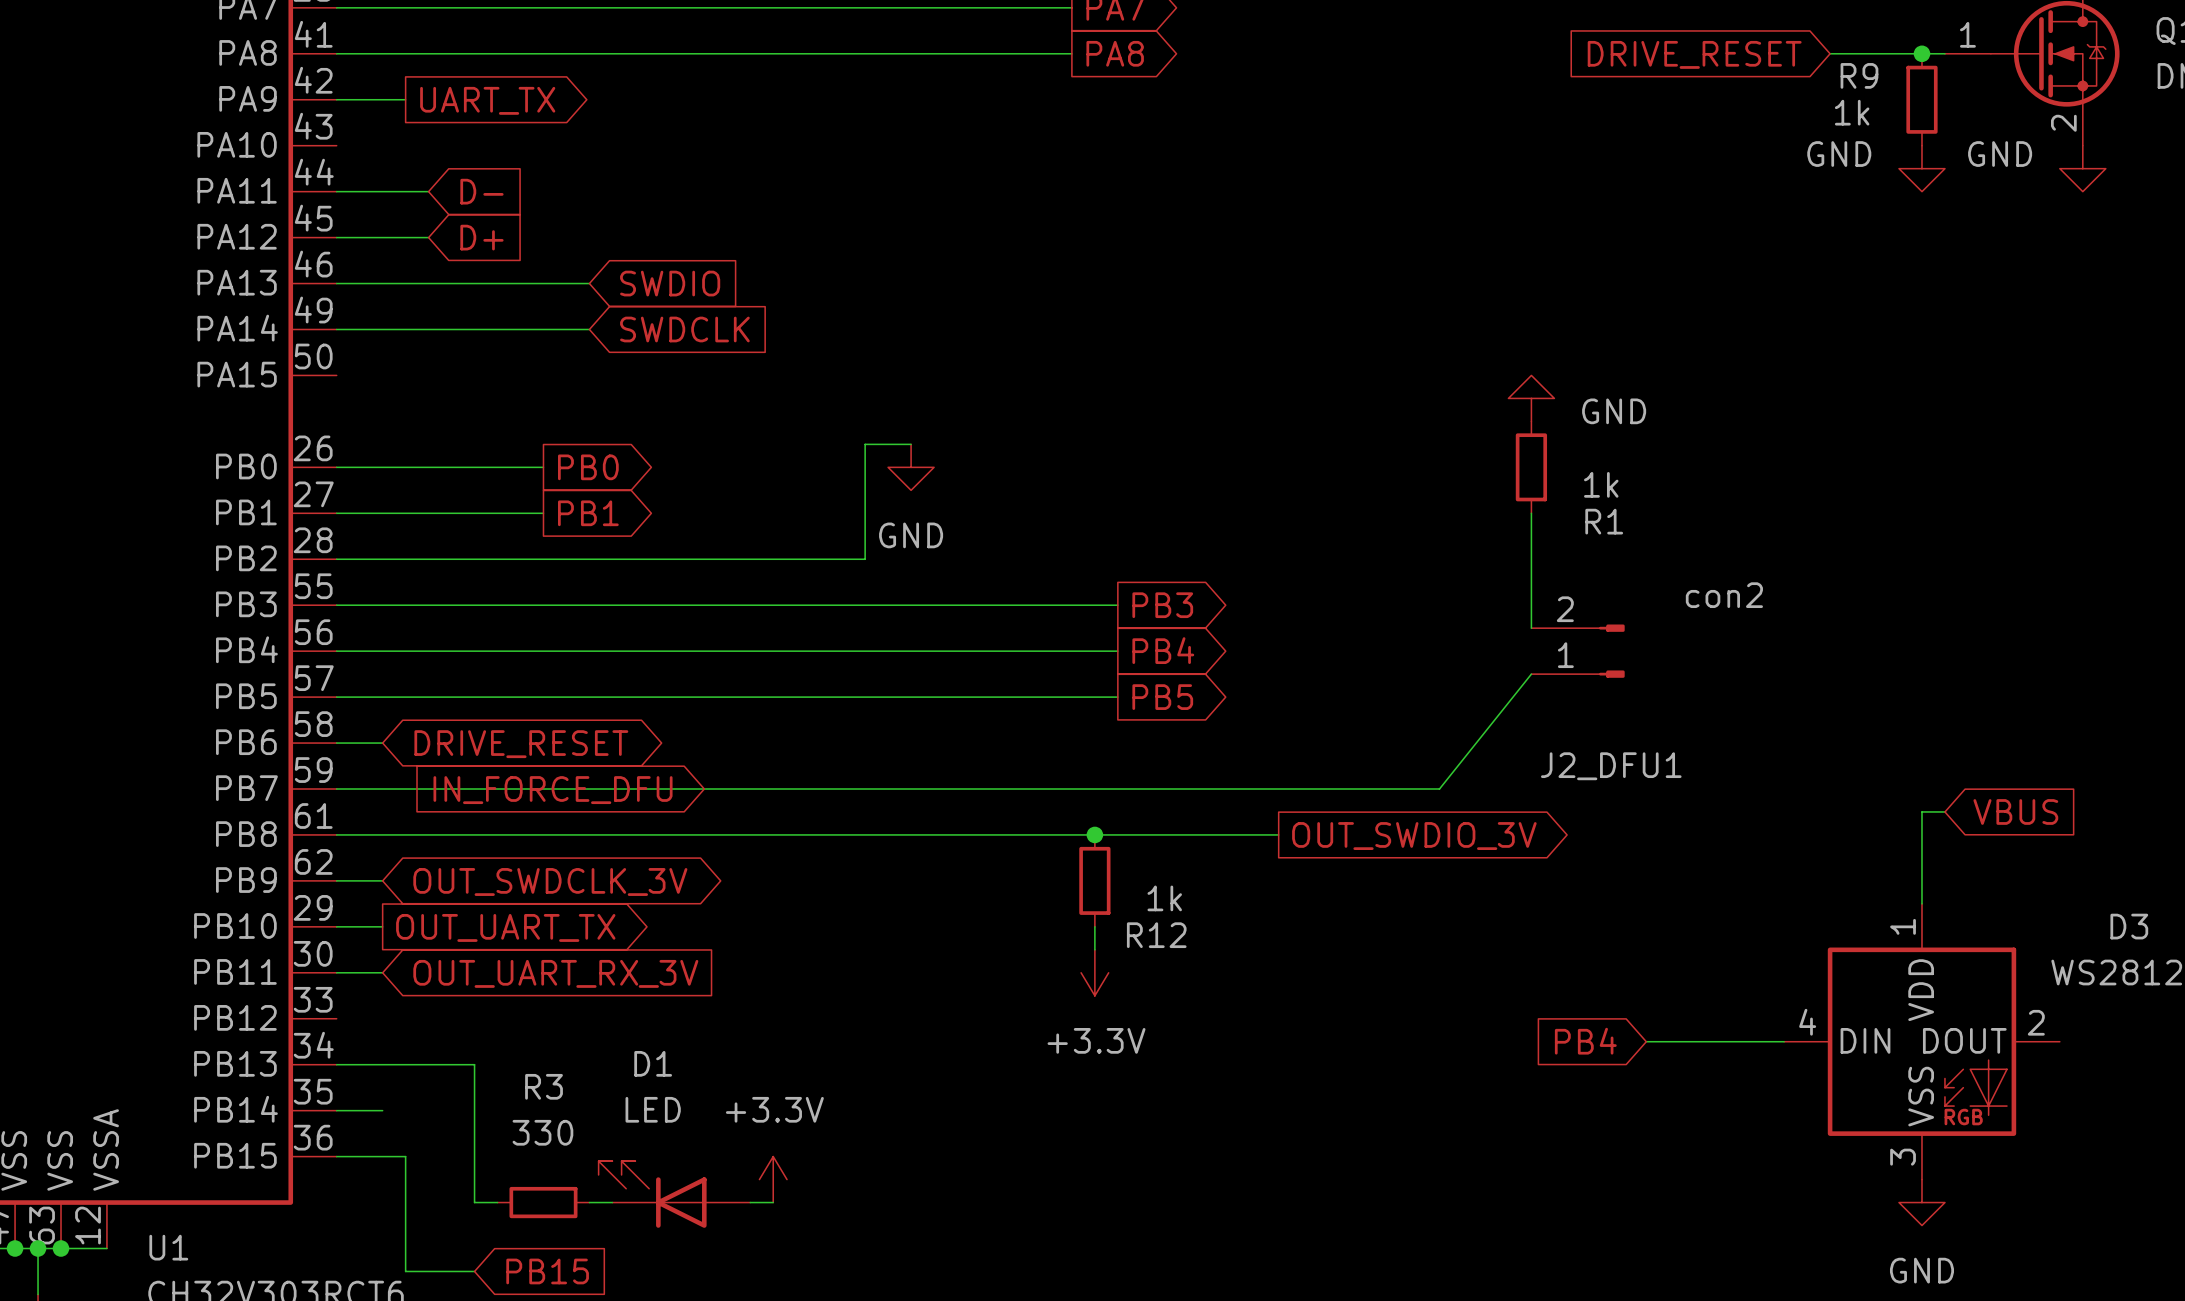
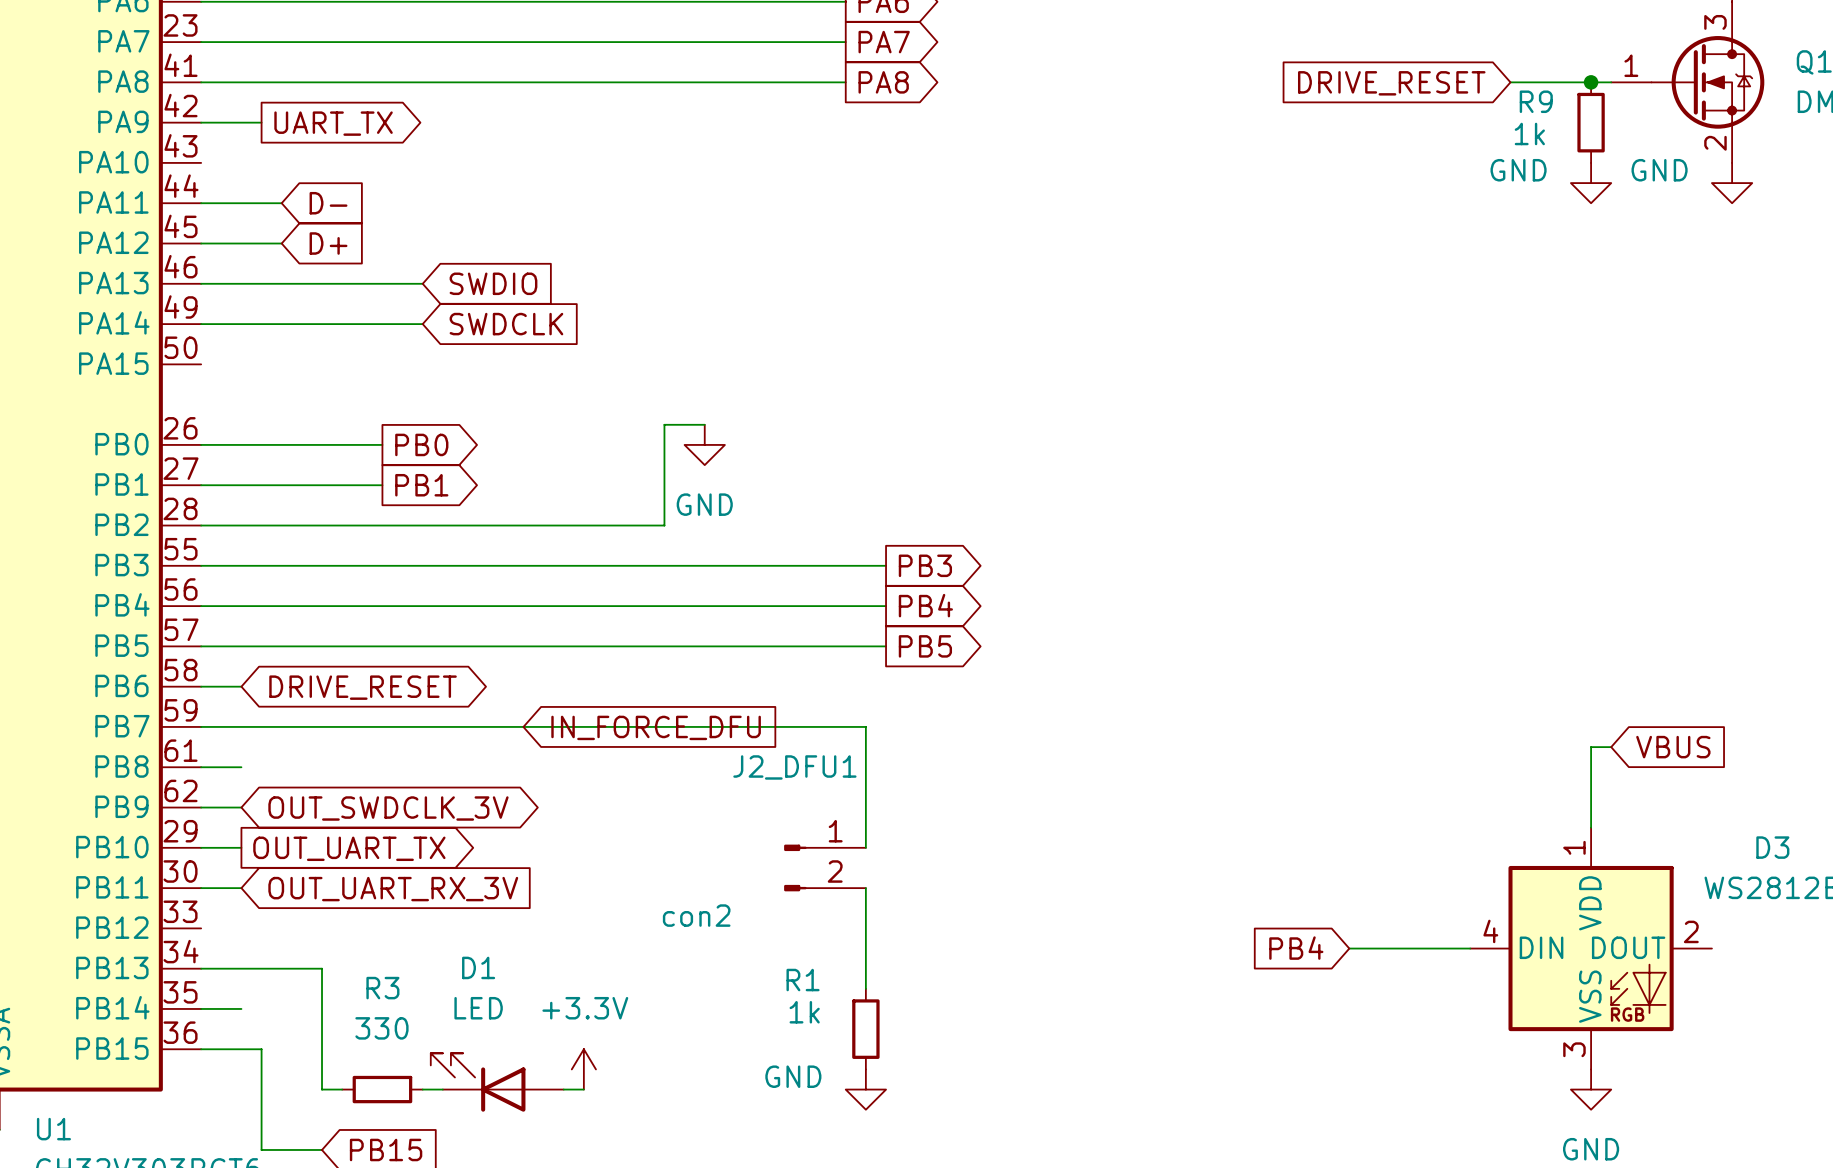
power symbol: GND (1531, 398) -> none
R1 position: (1531, 467) -> (865, 1029)
R1 value position: 1k (1601, 484) -> 1k (804, 1012)
wire: (1531, 513) (1531, 628) -> none
R1 name position: R1 (1604, 521) -> R1 (803, 980)
J2_DFU1 position: (1578, 651) -> (825, 867)
J2_DFU1 rotation: 0° (1611, 651) -> 180° (795, 867)
wire: (1531, 674) (1439, 789) (1094, 789) -> none
global label rotation: 0° (553, 790) -> 180° (656, 727)
wire: (382, 834) (1278, 834) -> none
junction: (1094, 834) -> none
global label: OUT_SWDIO_3V (1414, 836) -> none
R12: 1k (1094, 880) -> none
wire: (1094, 926) (1094, 949) -> (865, 847) (865, 726)
wire: none -> (865, 888) (865, 988)
power symbol: +3.3V (1094, 972) -> none
power symbol: none -> GND (865, 1089)

